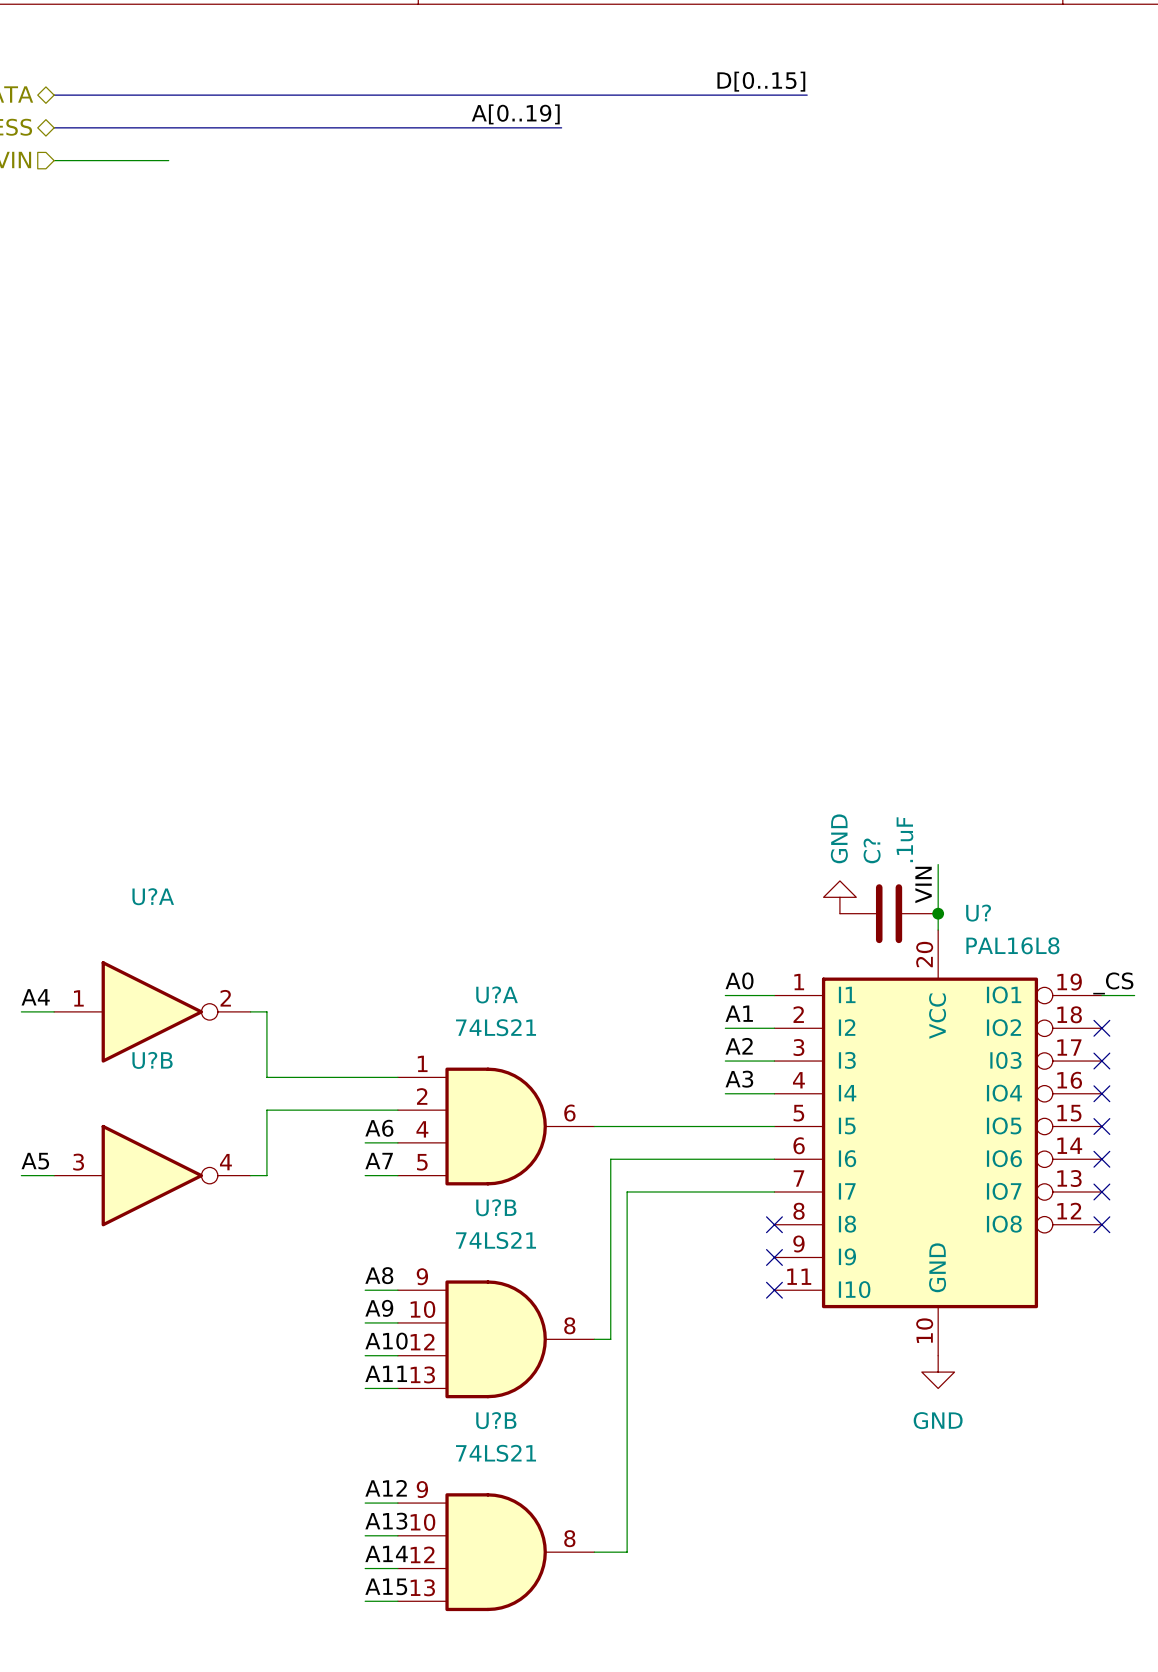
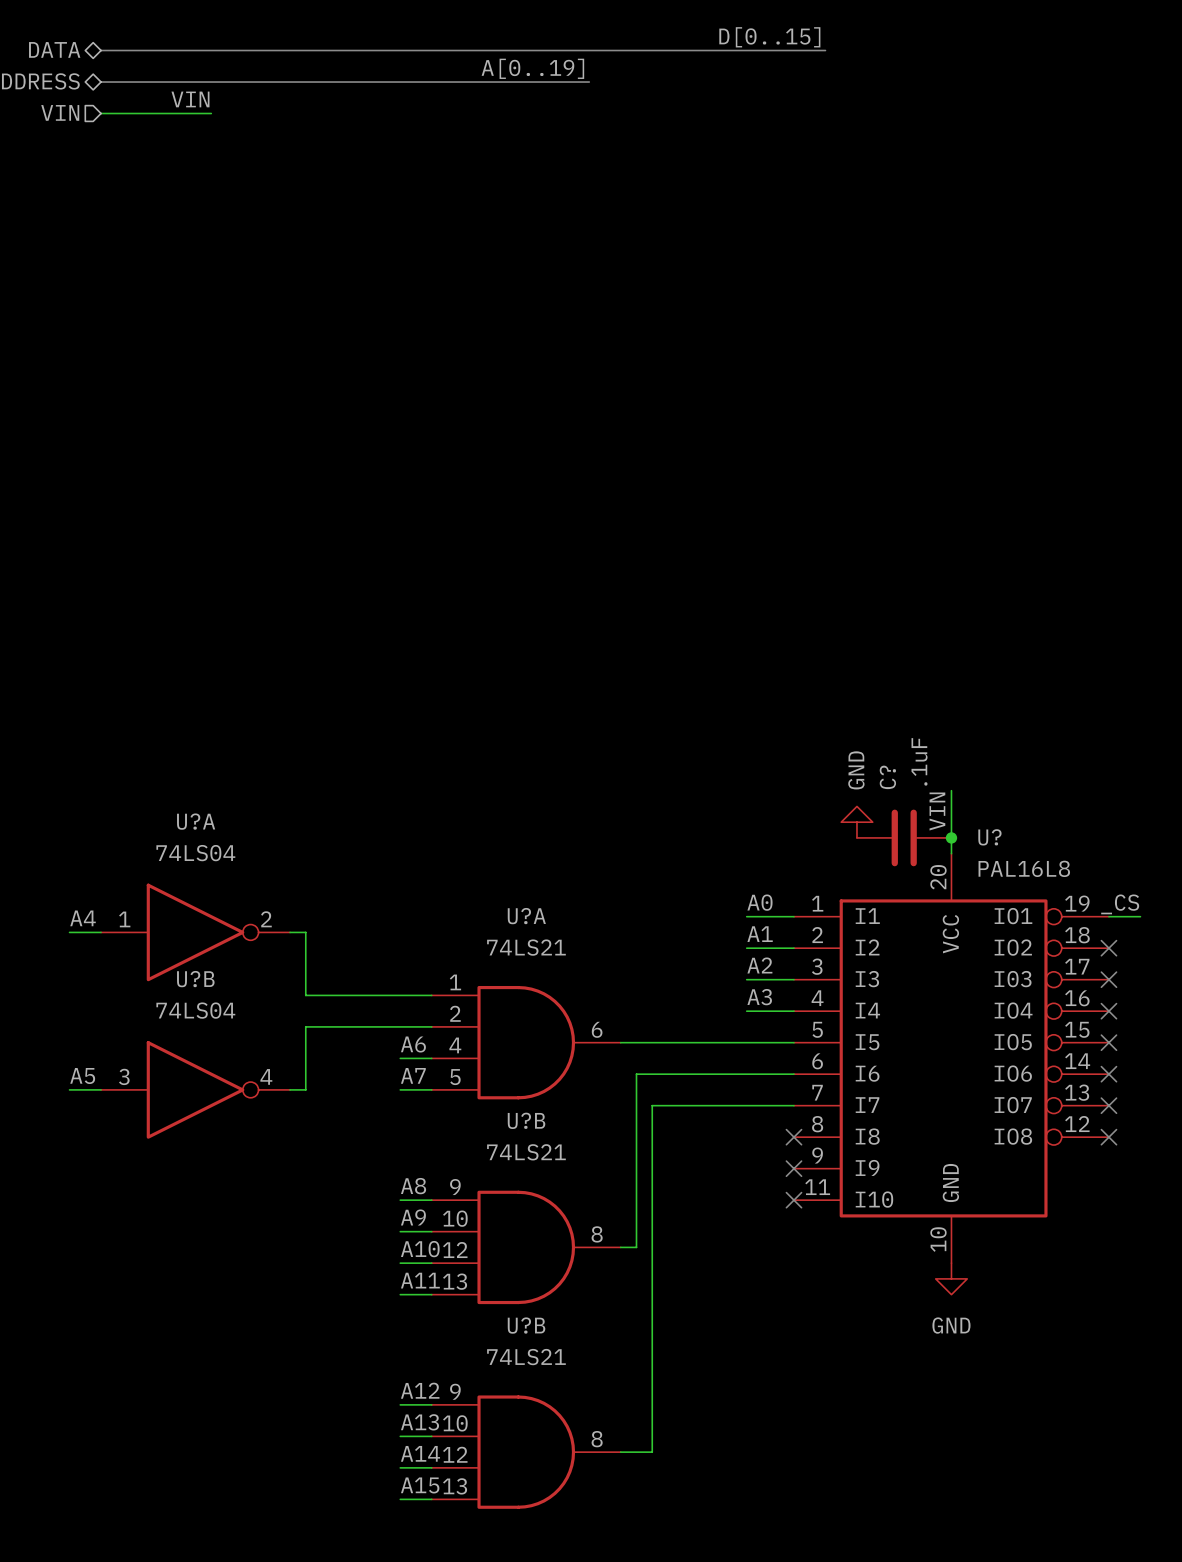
label: none -> VIN (190, 99)
U?A value: none -> 74LS04 (195, 853)
U?B value: none -> 74LS04 (195, 1010)

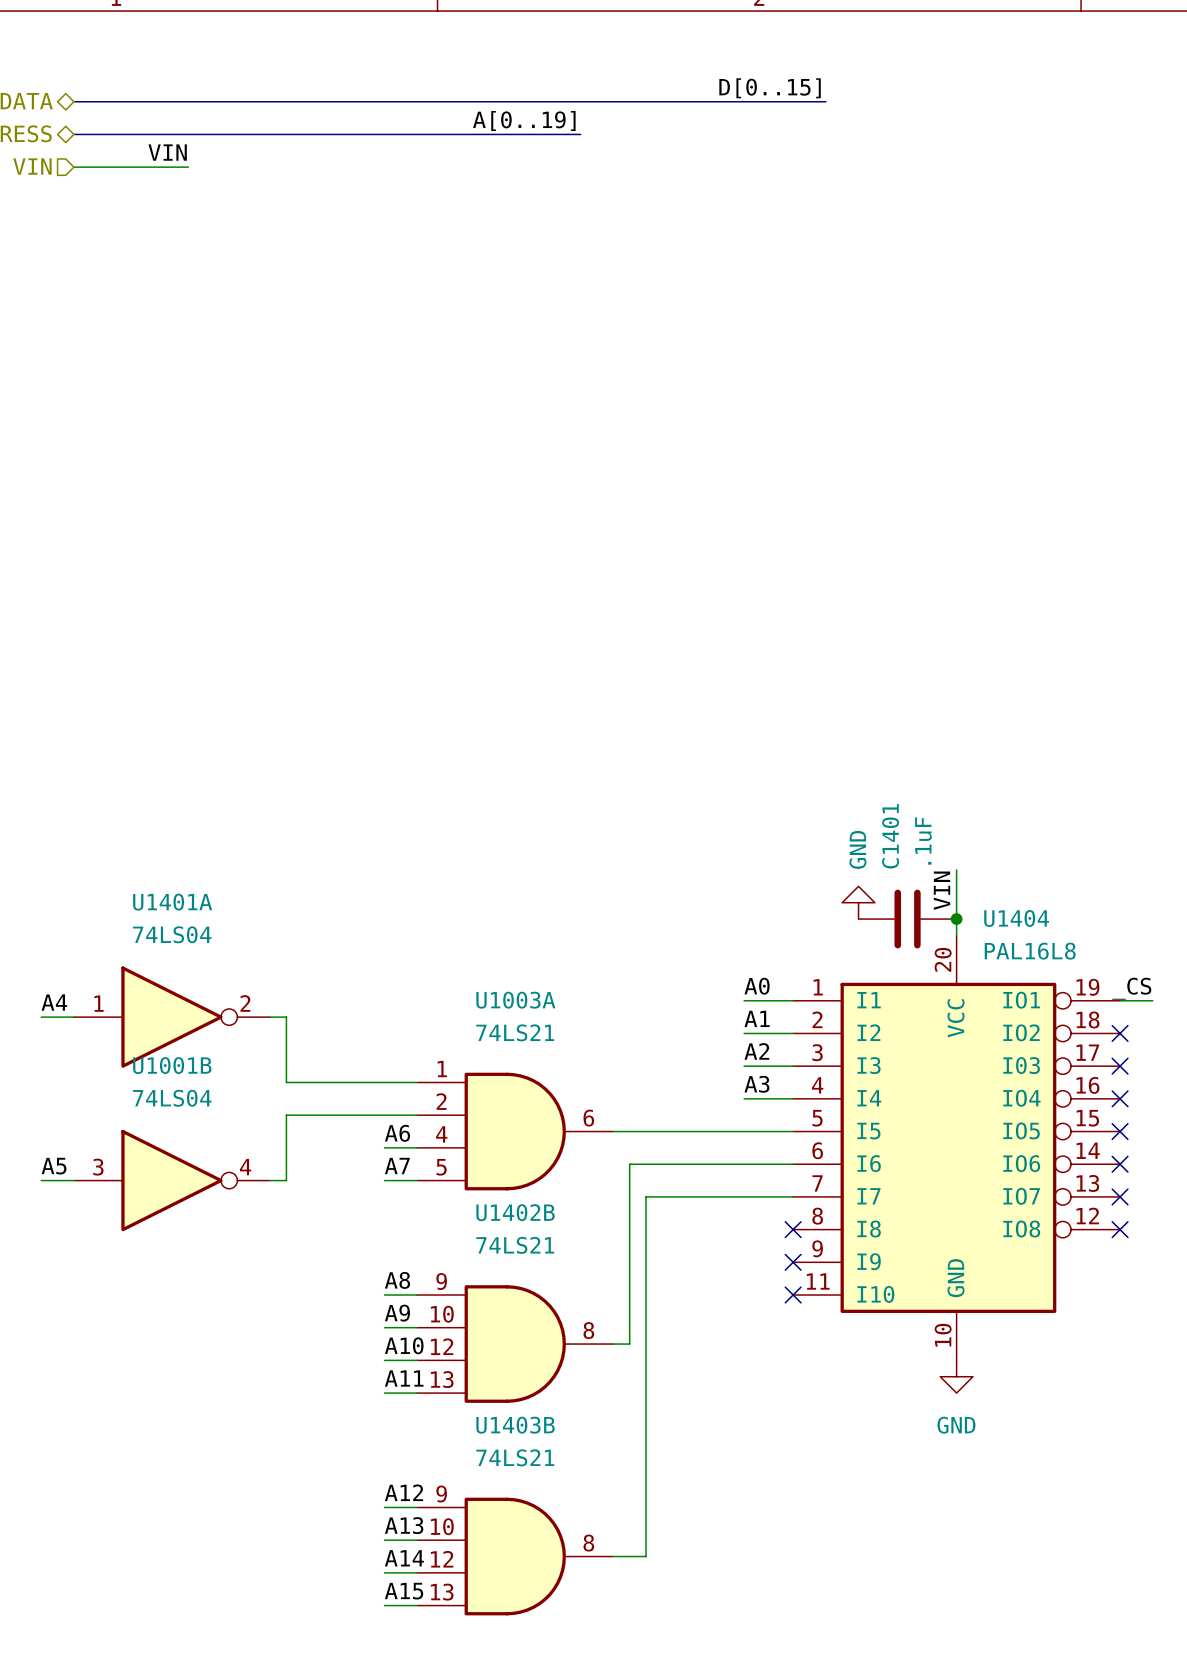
C? name: C? (887, 777) -> C1401 (890, 836)
U?A name: U?A (196, 821) -> U1401A (172, 902)
U? name: U? (989, 837) -> U1404 (1016, 918)
U?A name: U?A (526, 916) -> U1003A (515, 1000)
U?B name: U?B (195, 979) -> U1001B (172, 1065)
U?B name: U?B (526, 1120) -> U1402B (515, 1212)
U?B name: U?B (526, 1325) -> U1403B (515, 1425)

